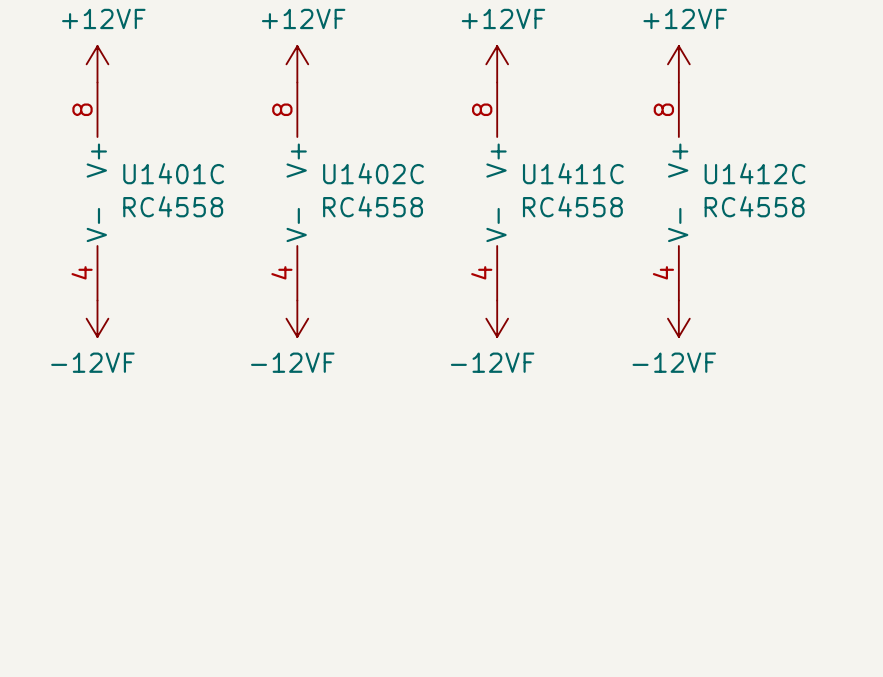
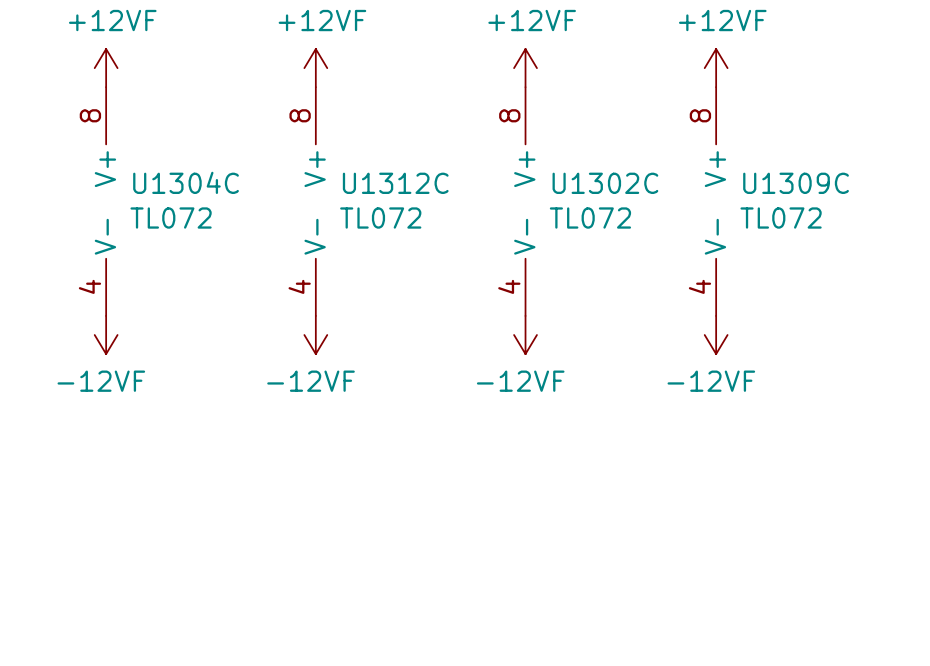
U1401C name: U1401C (173, 173) -> U1304C (186, 182)
U1402C name: U1402C (373, 173) -> U1312C (395, 183)
U1411C name: U1411C (573, 173) -> U1302C (605, 183)
U1412C name: U1412C (755, 173) -> U1309C (796, 183)
U1401C value: RC4558 (173, 206) -> TL072 (171, 218)
U1402C value: RC4558 (373, 206) -> TL072 (380, 218)
U1411C value: RC4558 (572, 206) -> TL072 (590, 218)
U1412C value: RC4558 (754, 206) -> TL072 (781, 218)

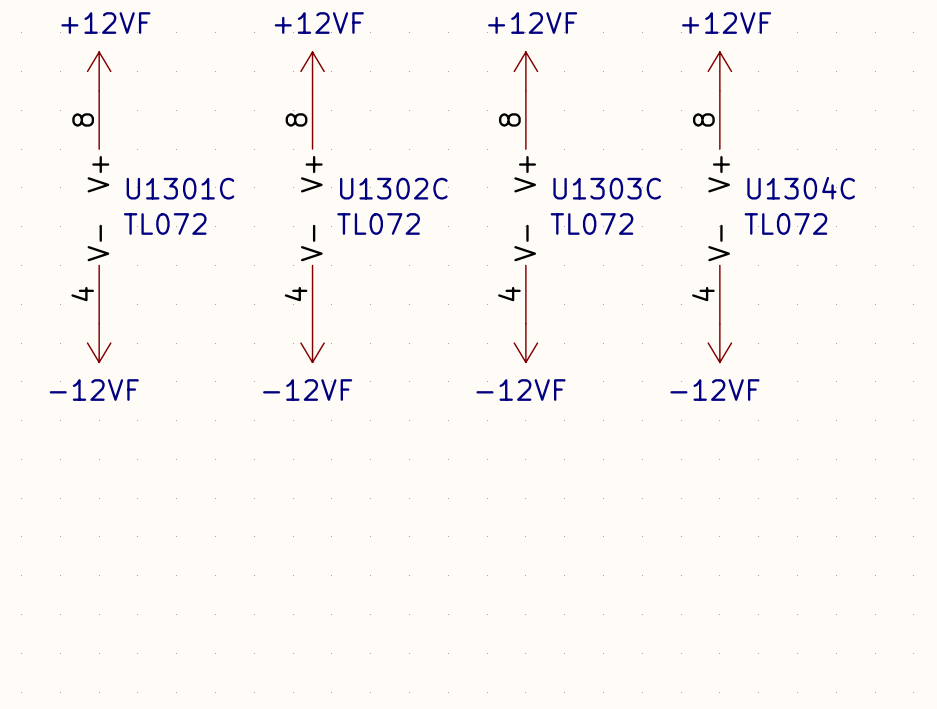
U1304C name: U1304C (186, 182) -> U1301C (180, 188)
U1312C name: U1312C (395, 183) -> U1302C (393, 188)
U1302C name: U1302C (605, 183) -> U1303C (607, 188)
U1309C name: U1309C (796, 183) -> U1304C (801, 188)

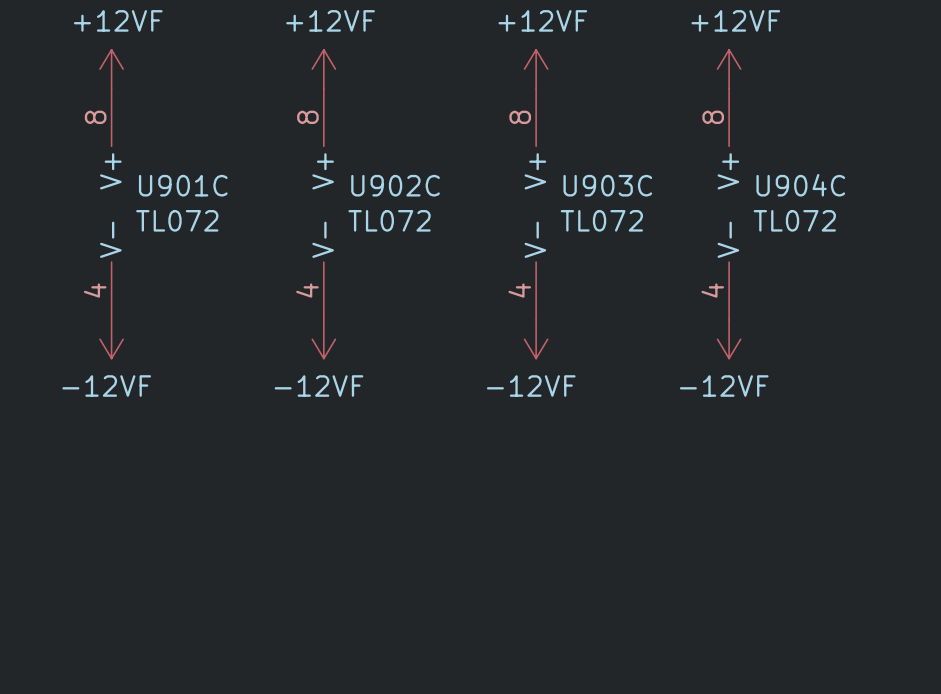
U1301C name: U1301C (180, 188) -> U901C (183, 185)
U1302C name: U1302C (393, 188) -> U902C (395, 185)
U1303C name: U1303C (607, 188) -> U903C (607, 185)
U1304C name: U1304C (801, 188) -> U904C (800, 185)

